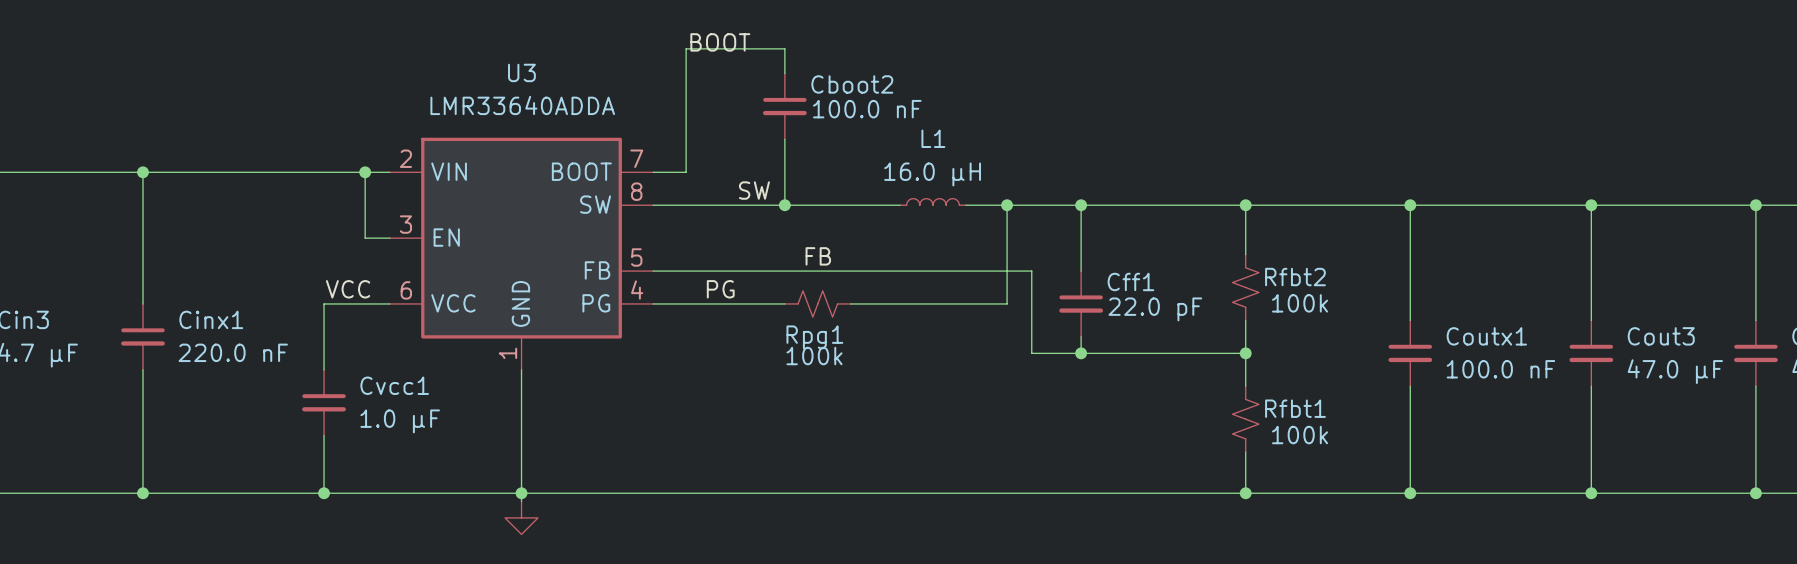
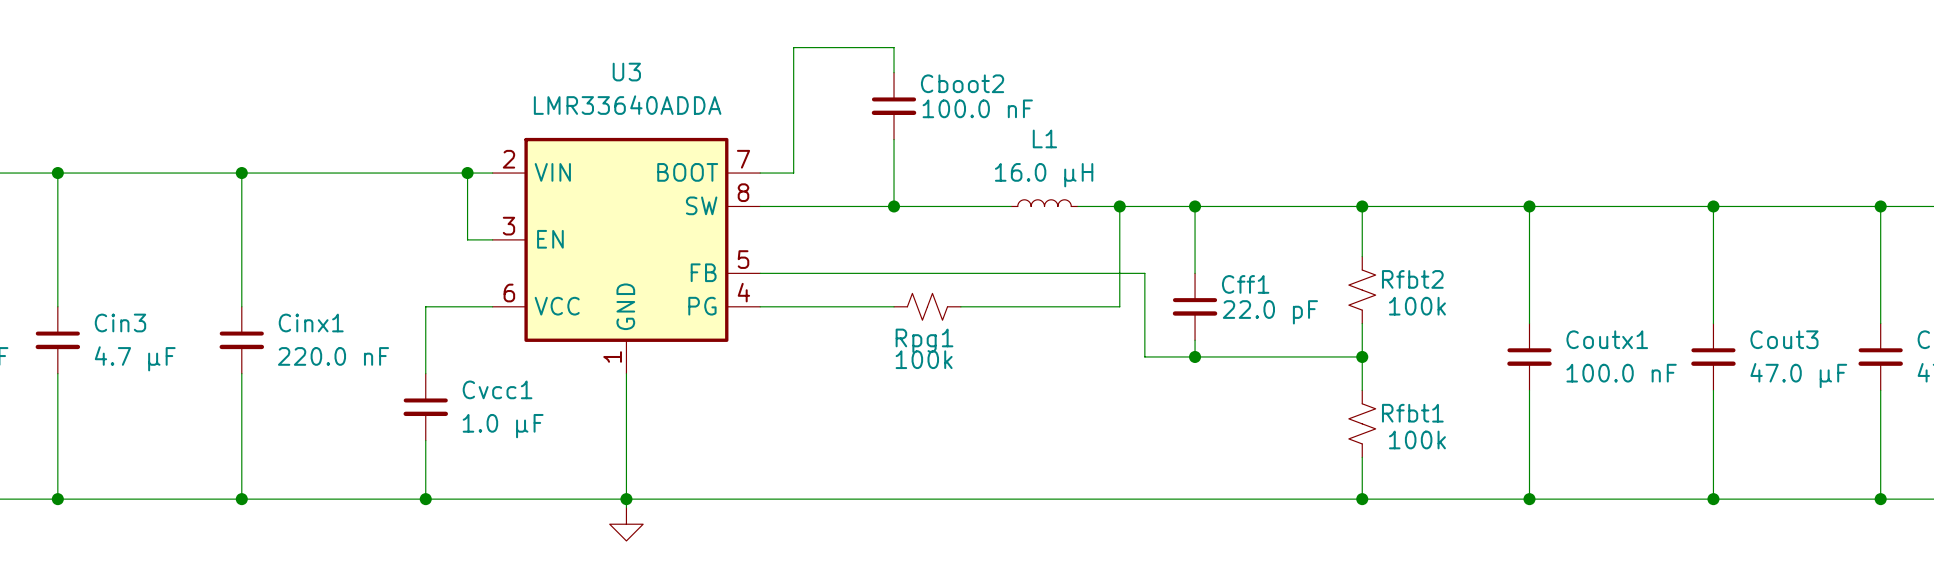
label: BOOT (720, 42) -> none
label: SW (754, 190) -> none
label: FB (818, 256) -> none
label: VCC (348, 289) -> none
label: PG (720, 289) -> none

